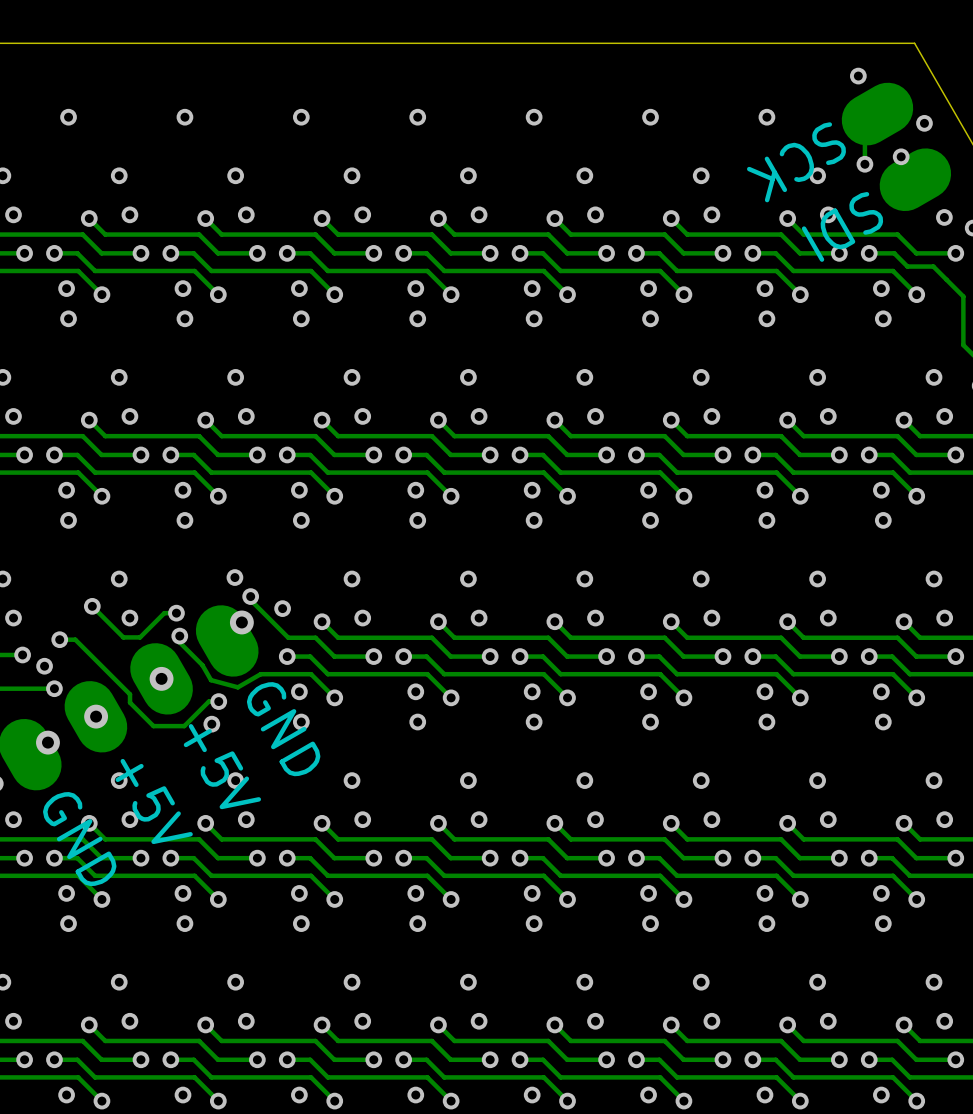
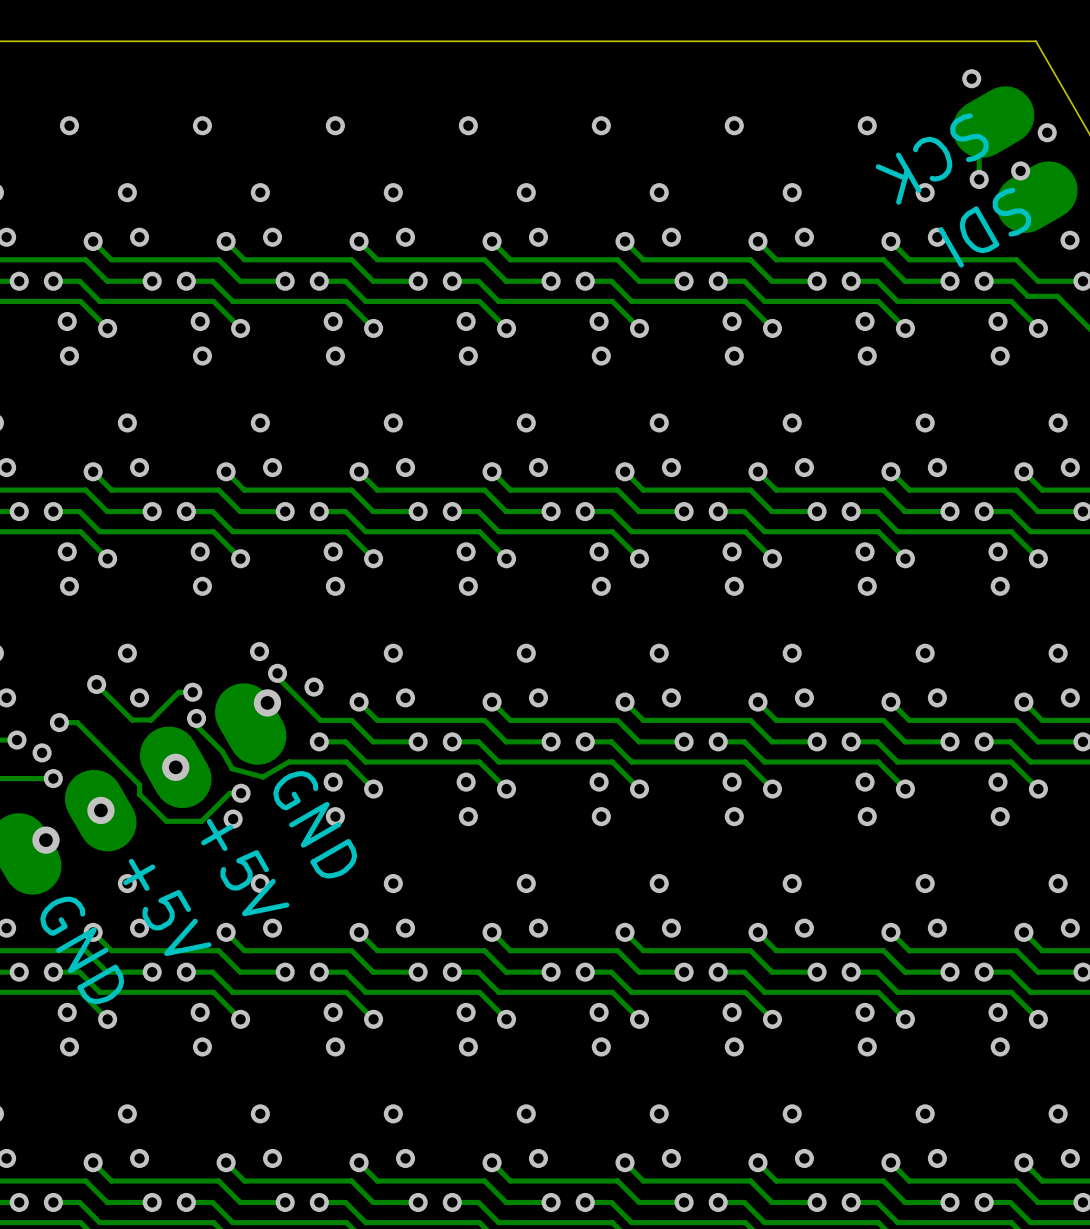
text position: SCK (796, 162) -> SCK (932, 159)
text position: SDI (842, 226) -> SDI (984, 227)

